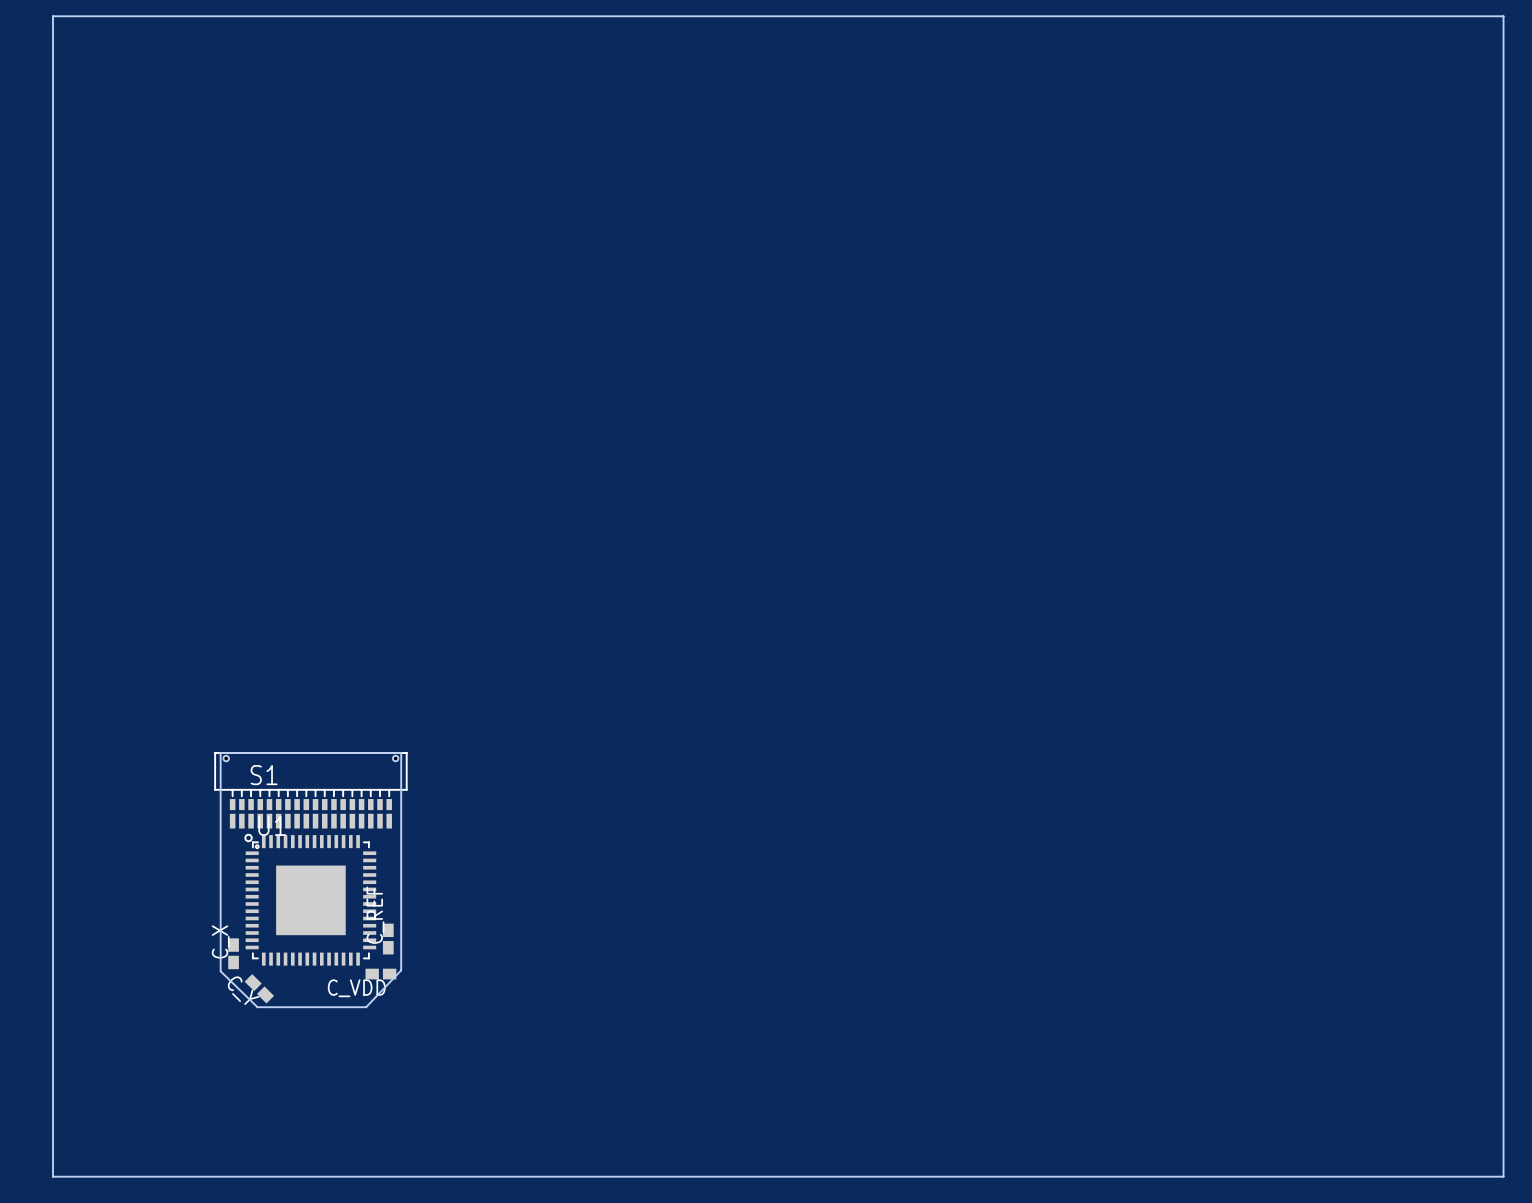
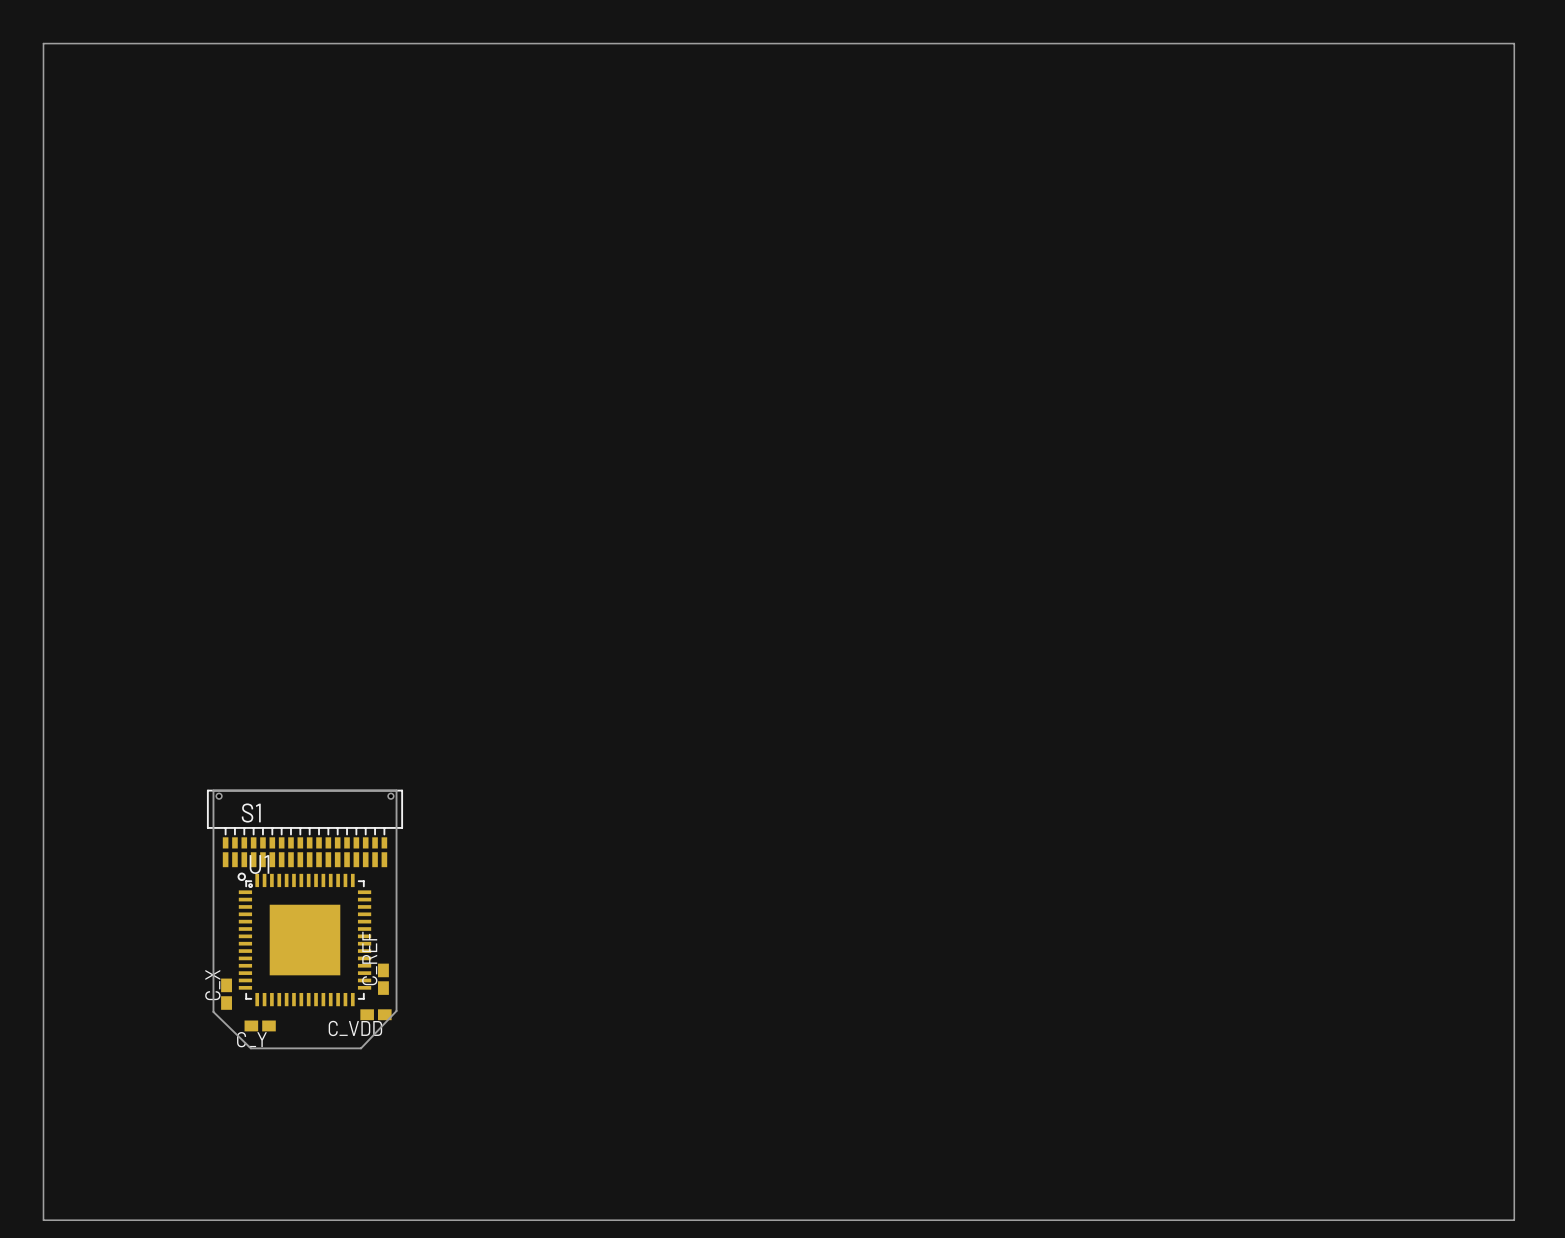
C_Y rotation: 0° (259, 988) -> 45° counterclockwise (260, 1025)

